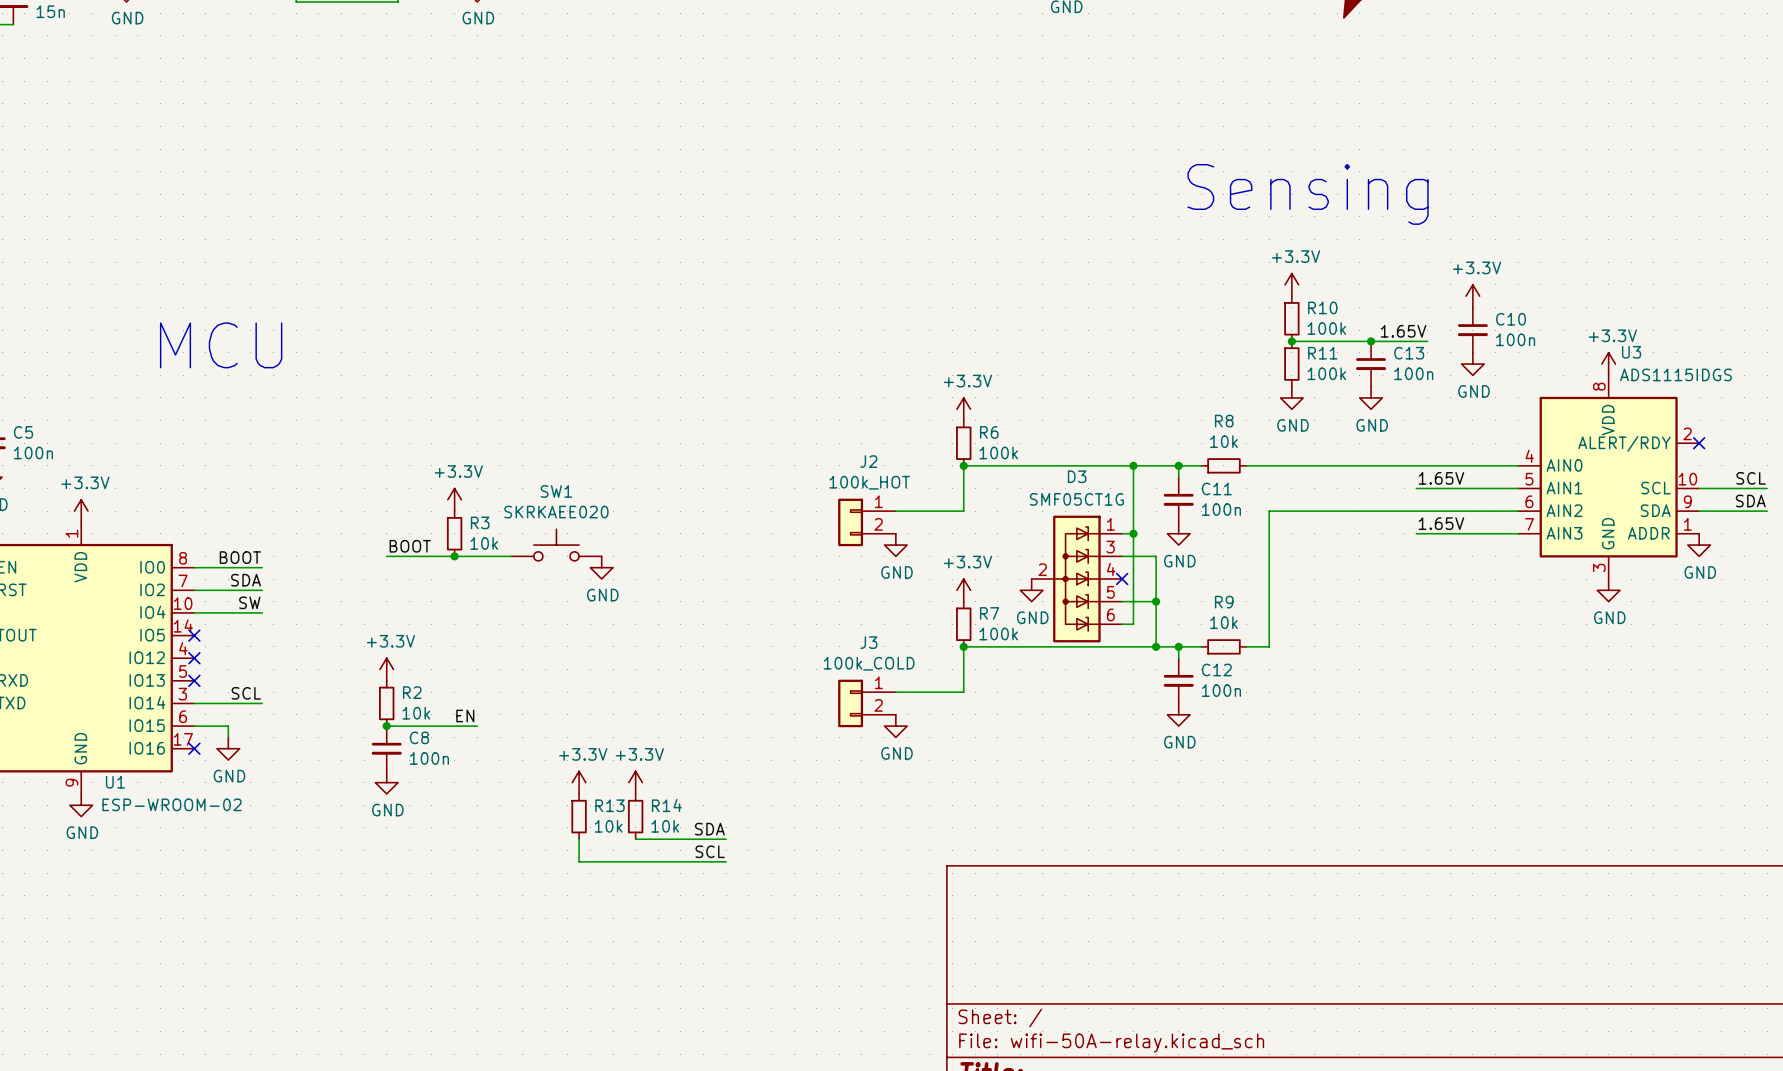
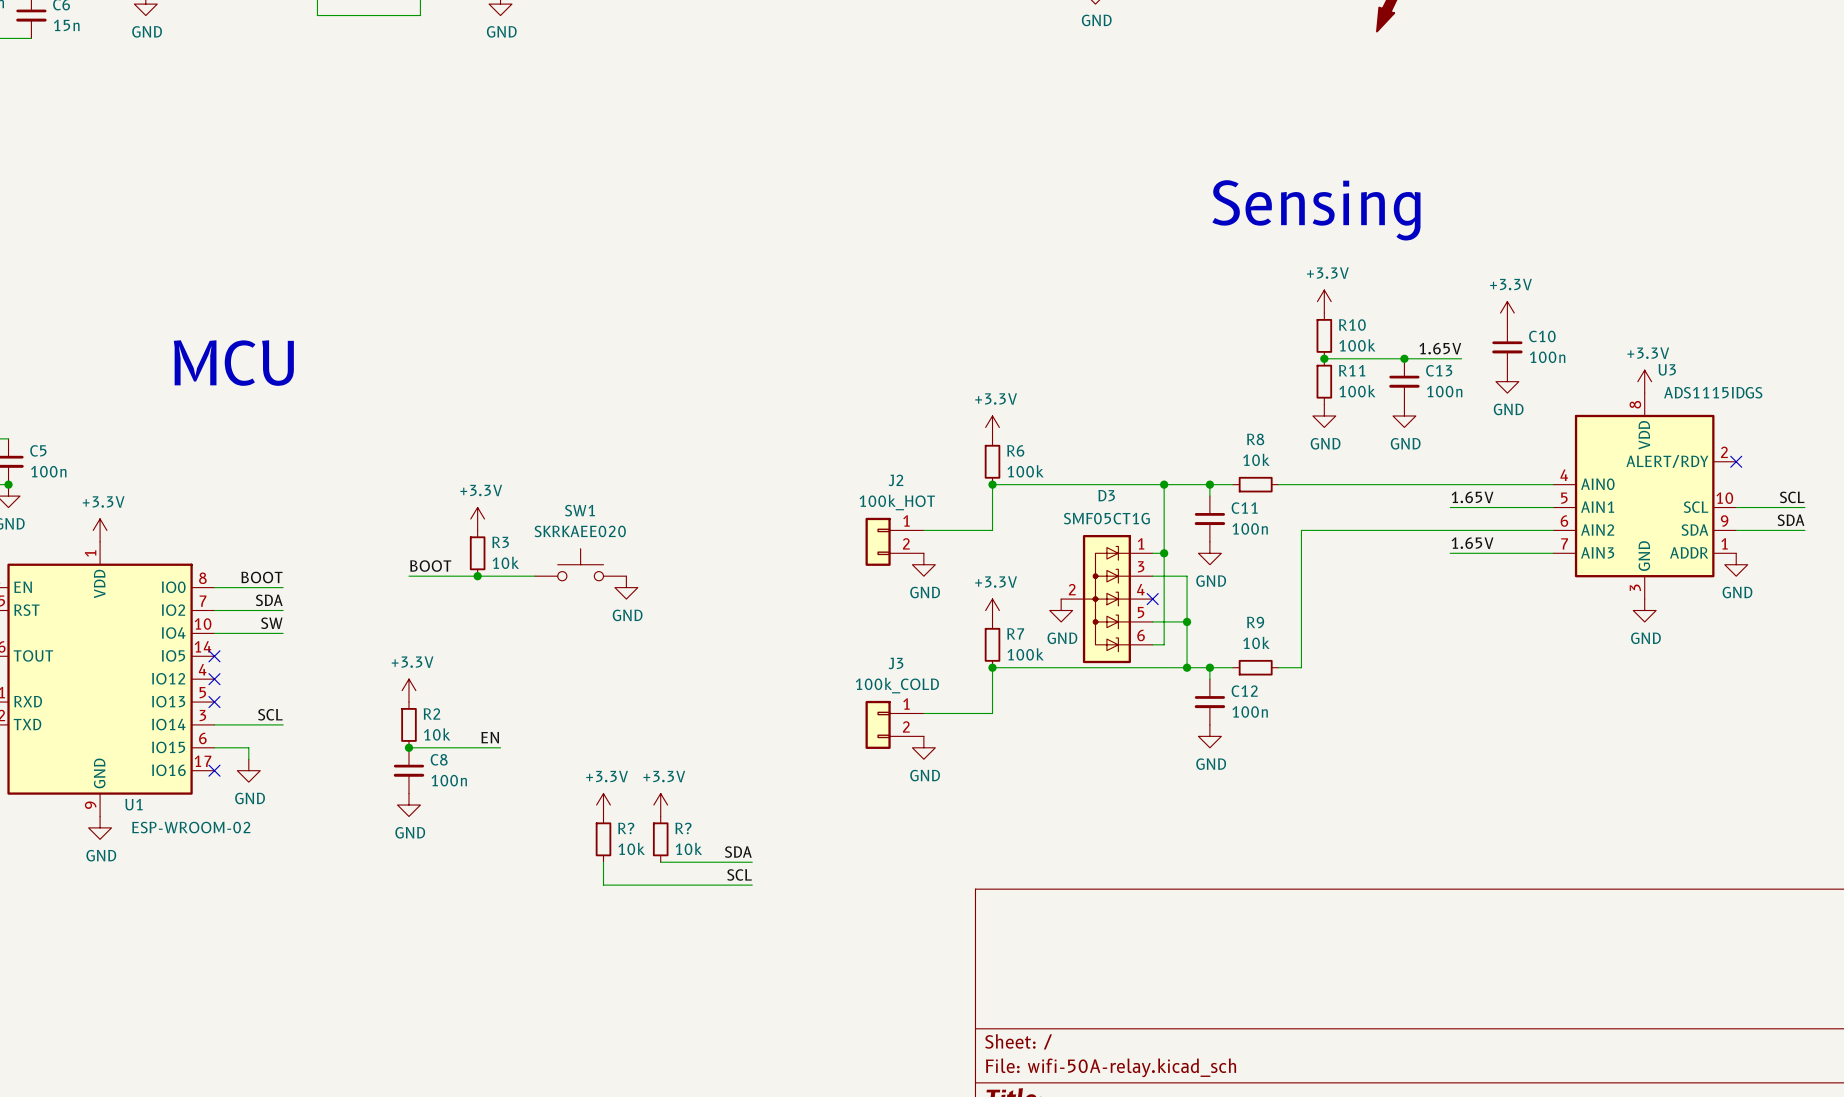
R13 name: R13 (610, 805) -> R? (626, 828)
R14 name: R14 (666, 805) -> R? (683, 828)

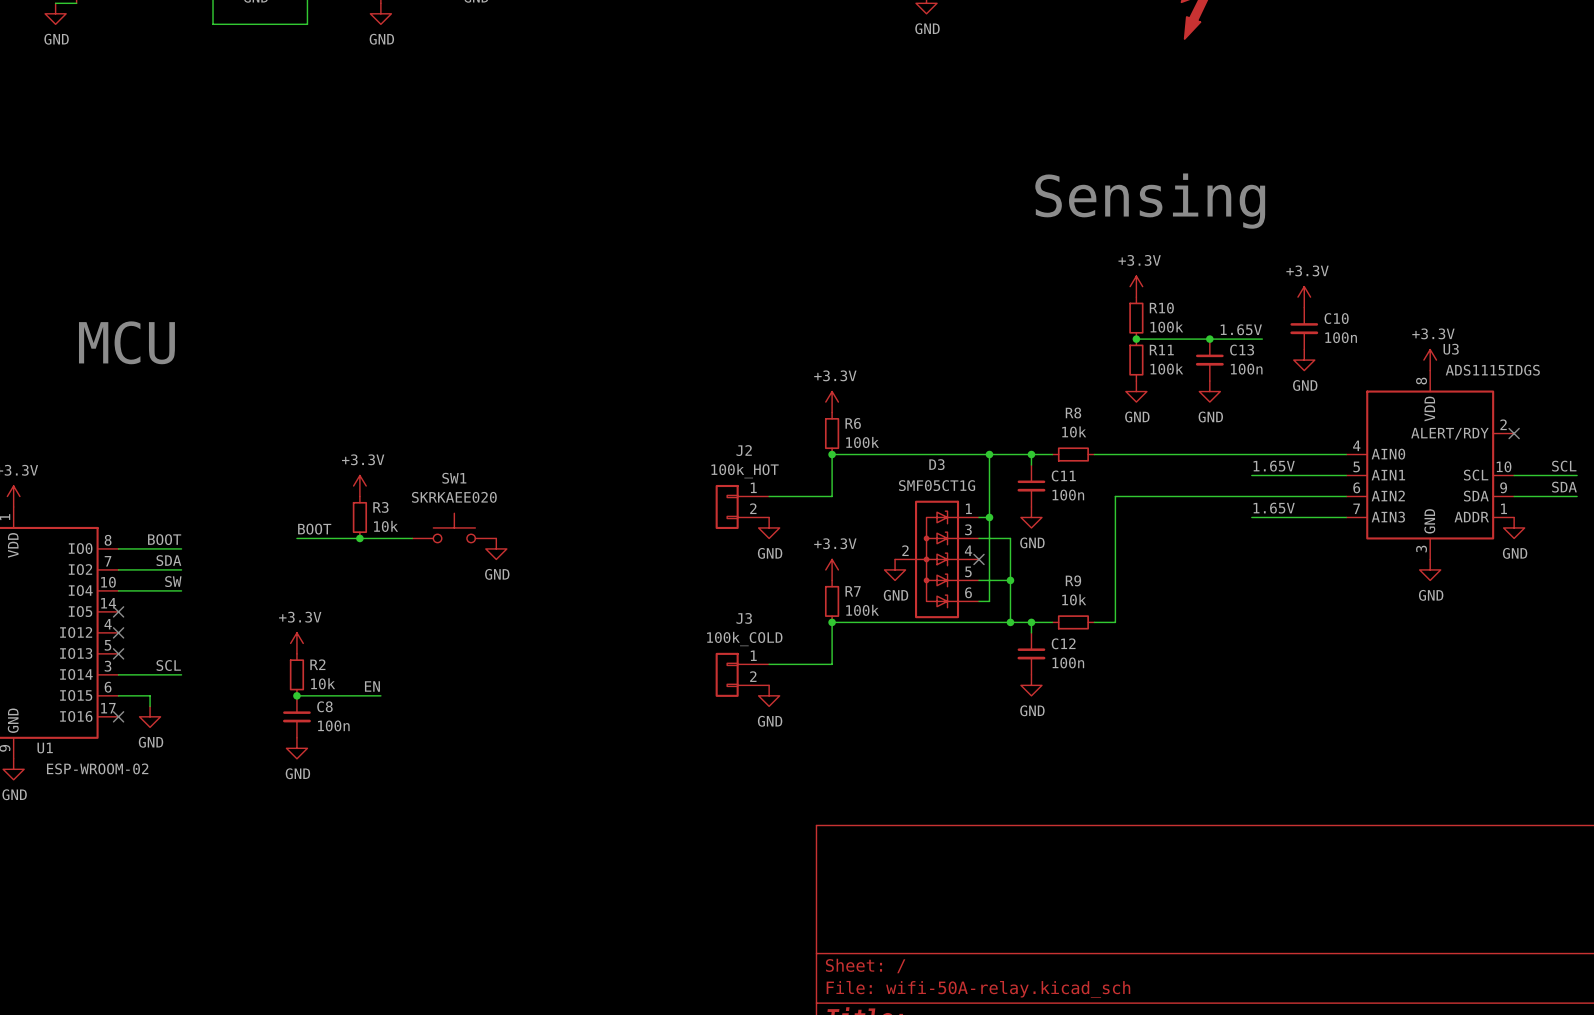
power symbol: +3.3V (603, 805) -> none
power symbol: +3.3V (660, 805) -> none
R?: 10k (603, 839) -> none
R?: 10k (660, 839) -> none
label: SDA (738, 852) -> none
wire: (603, 862) (603, 885) (752, 885) -> none
wire: (660, 862) (752, 862) -> none
label: SCL (739, 874) -> none

